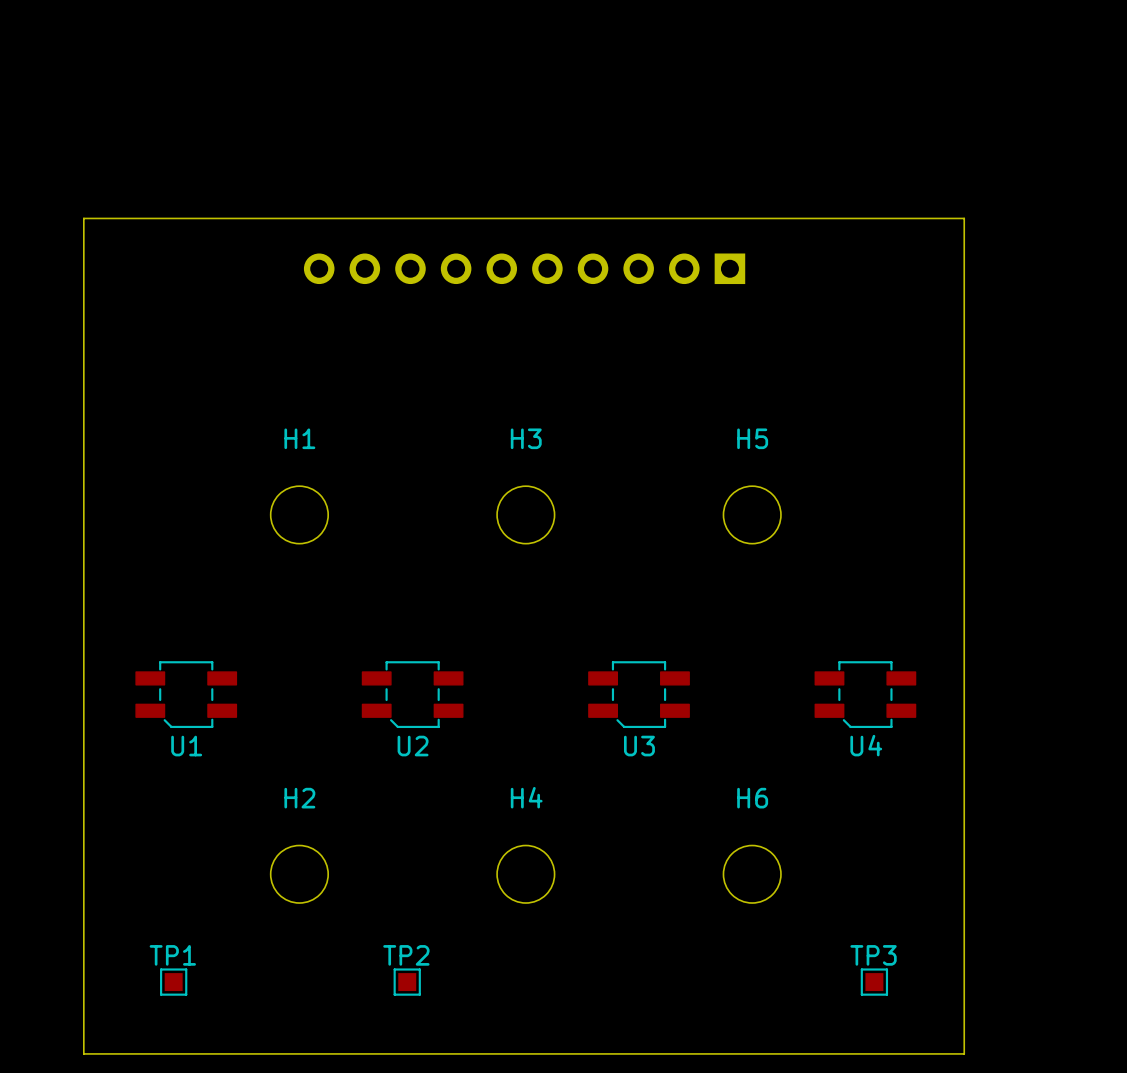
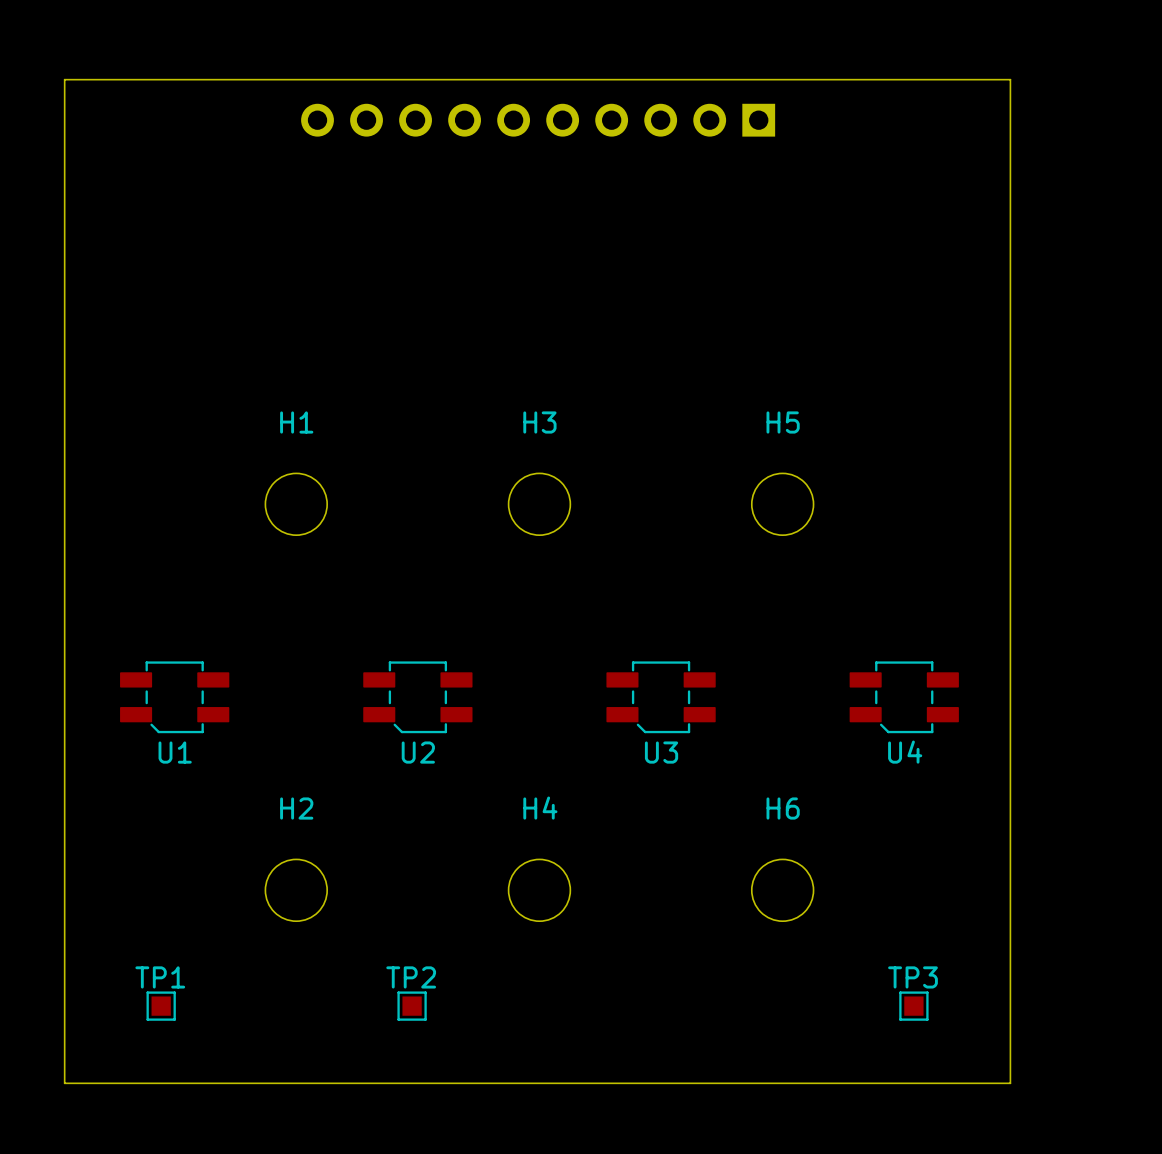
board edge: (83, 218) (964, 218) -> (64, 185) (64, 79) (1010, 79) (1010, 185)
part position: (524, 268) -> (538, 120)

